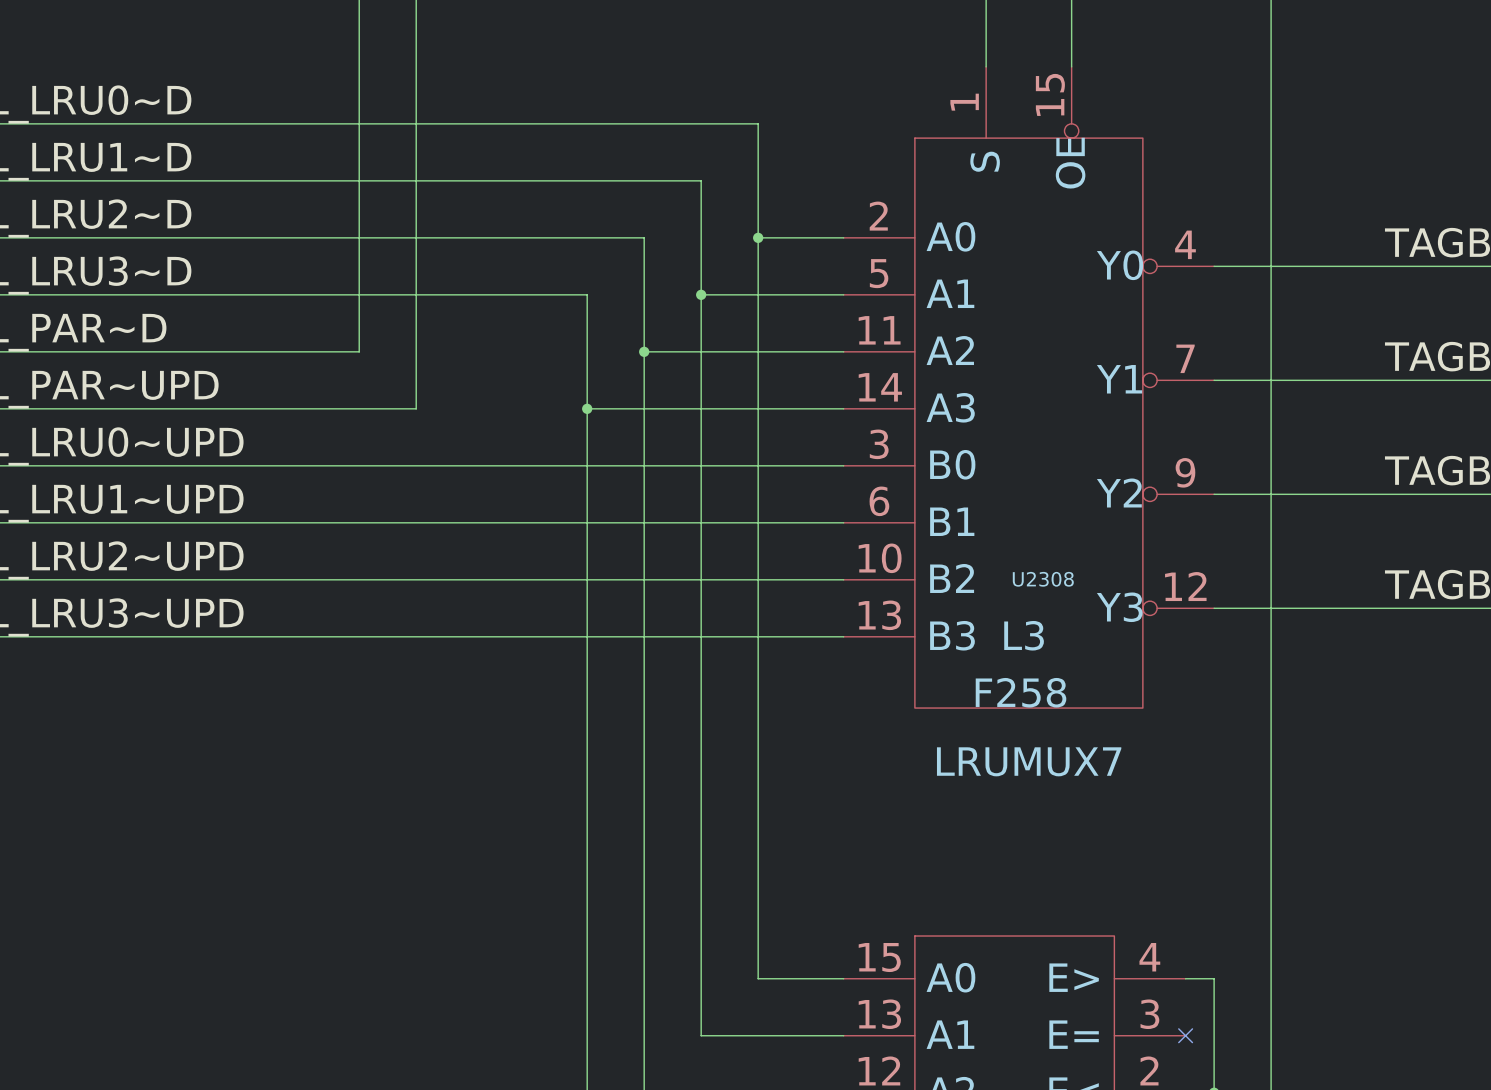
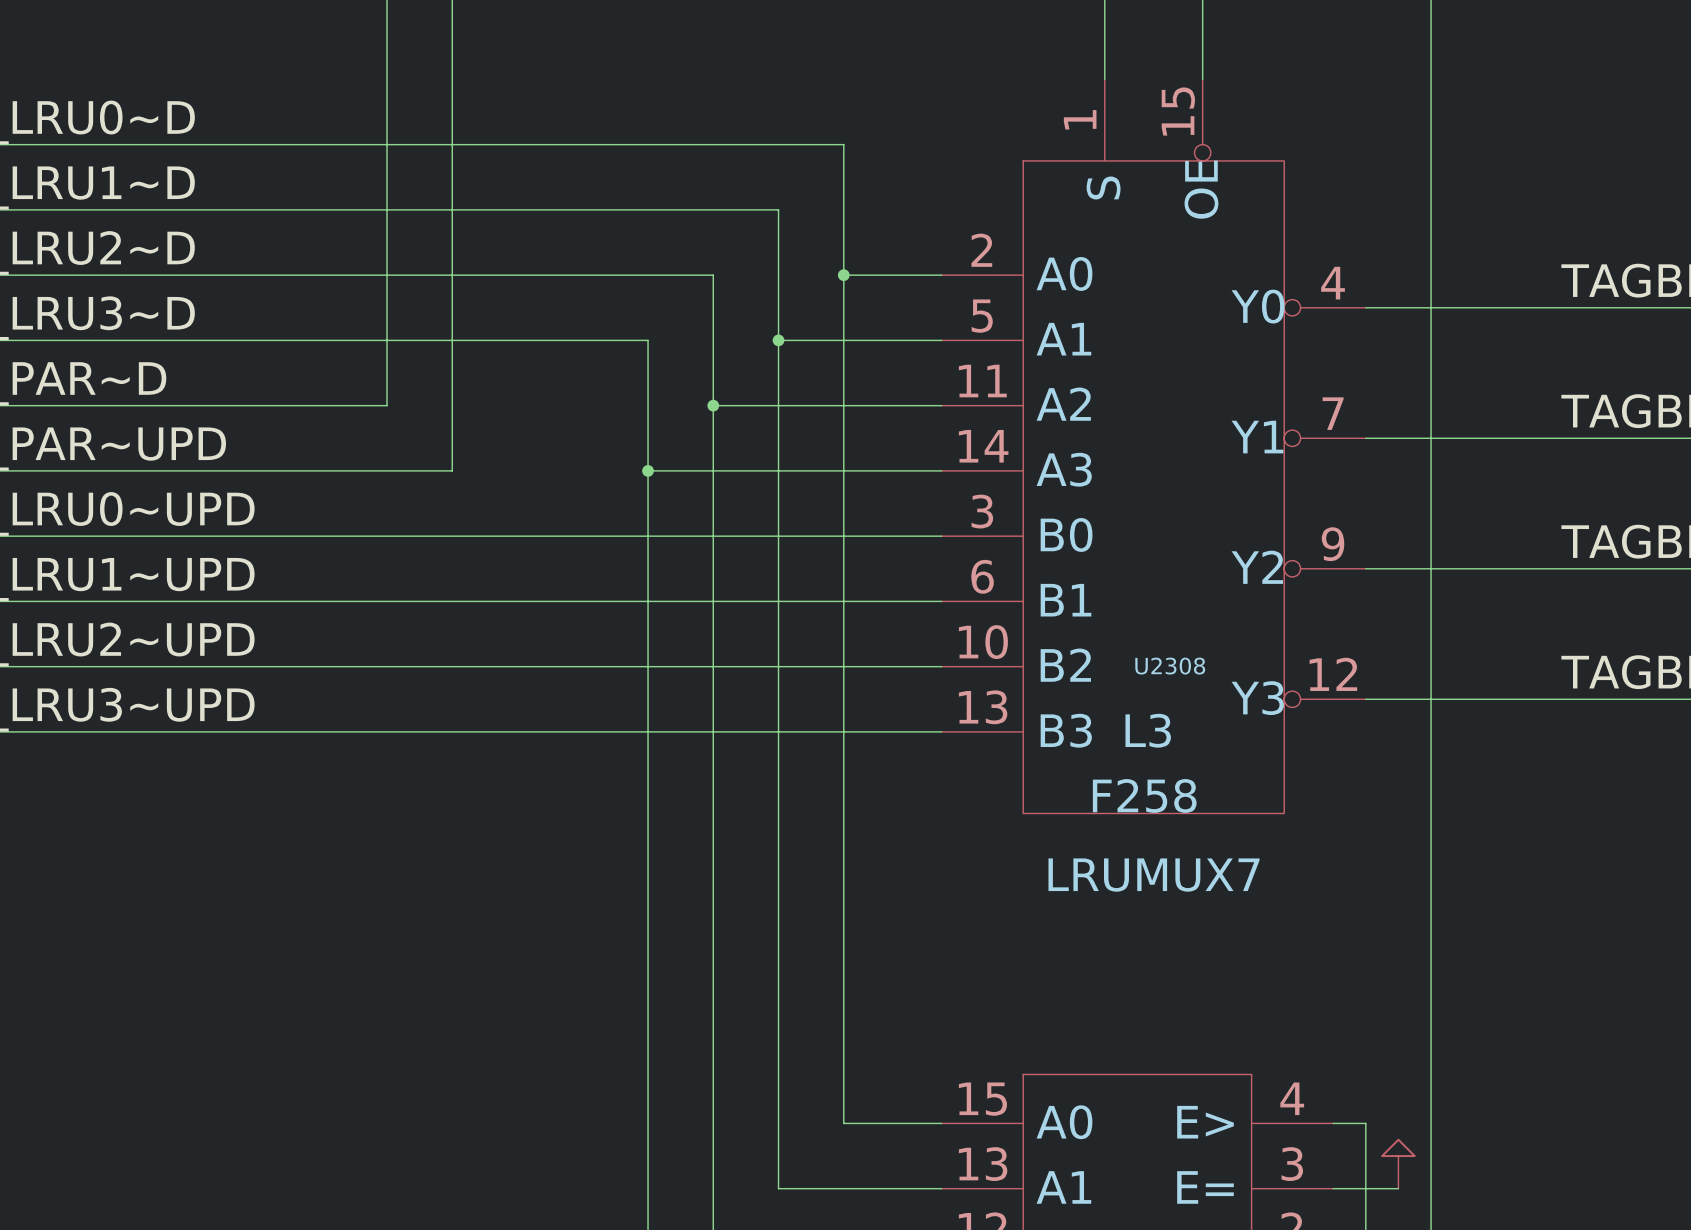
power symbol: none -> (1398, 1163)
wire: none -> (1333, 1188) (1398, 1188)
no-connect mark: (1185, 1035) -> none

